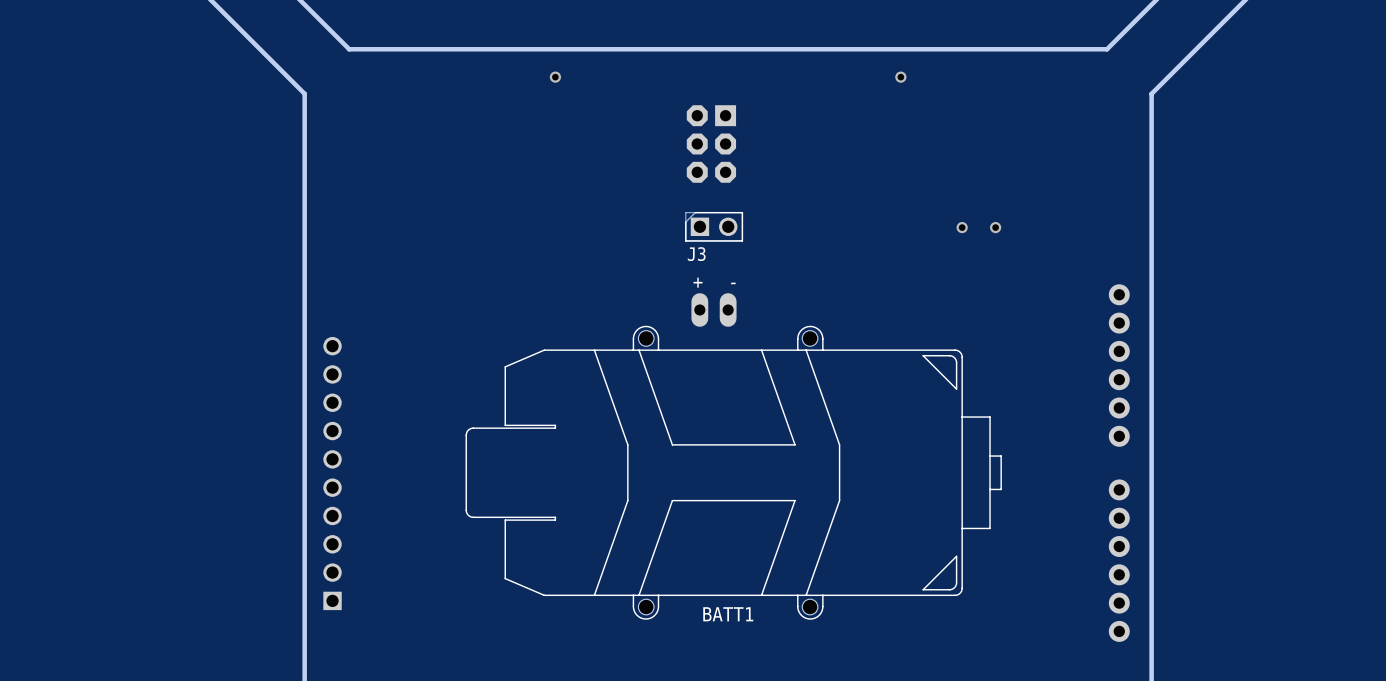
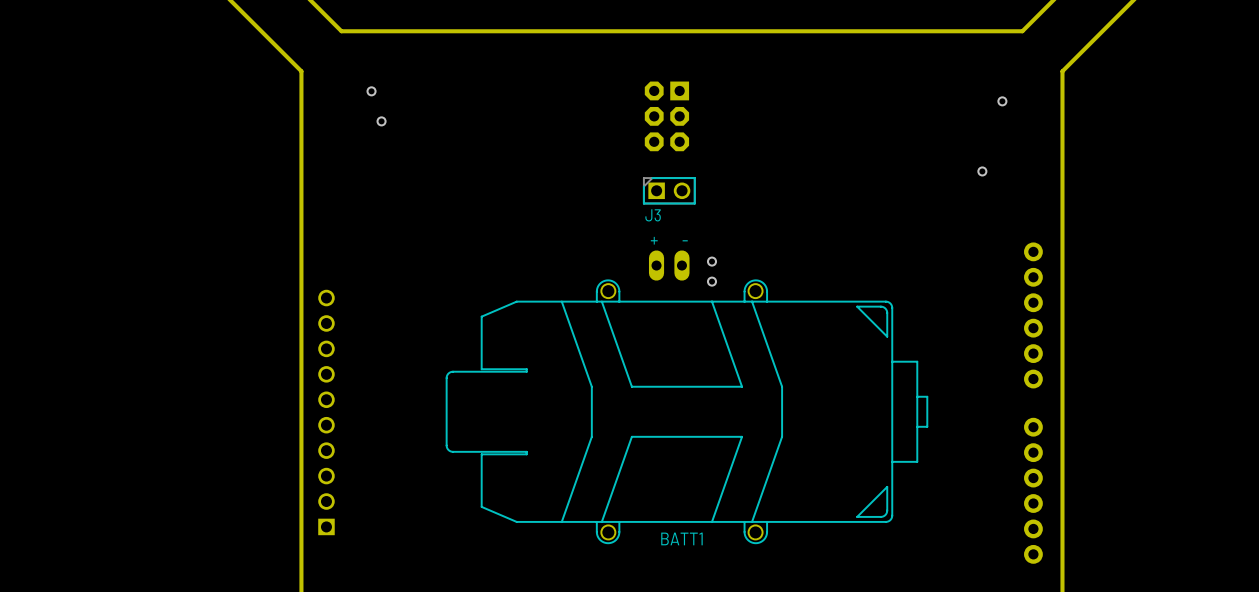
via: (555, 77) -> none
via: (900, 77) -> none
via: none -> (371, 91)
via: none -> (1002, 101)
via: none -> (381, 121)
via: none -> (982, 171)
via: (962, 227) -> none
via: (995, 227) -> none
via: none -> (712, 261)
via: none -> (712, 281)

